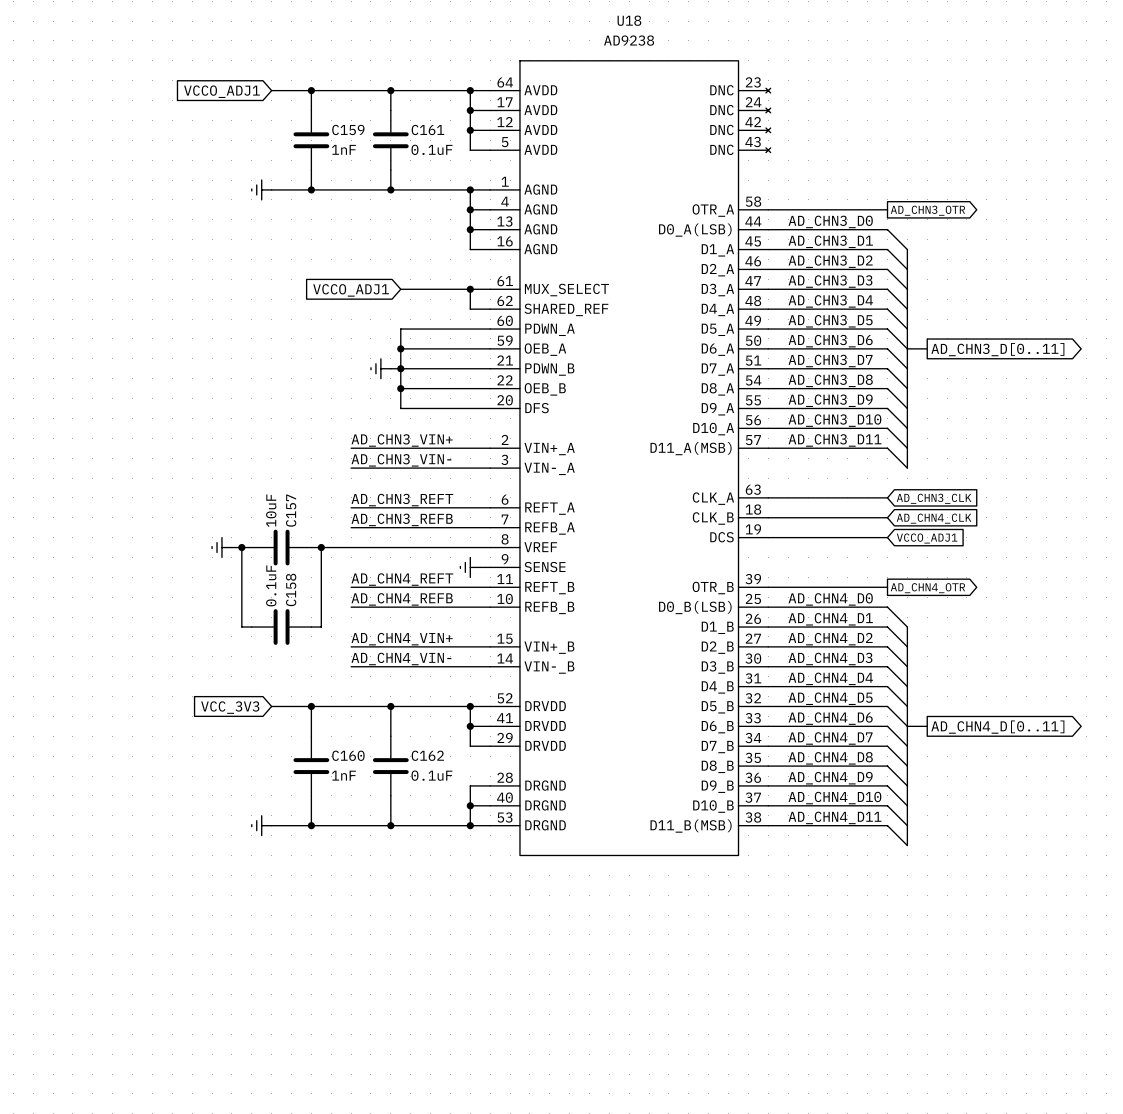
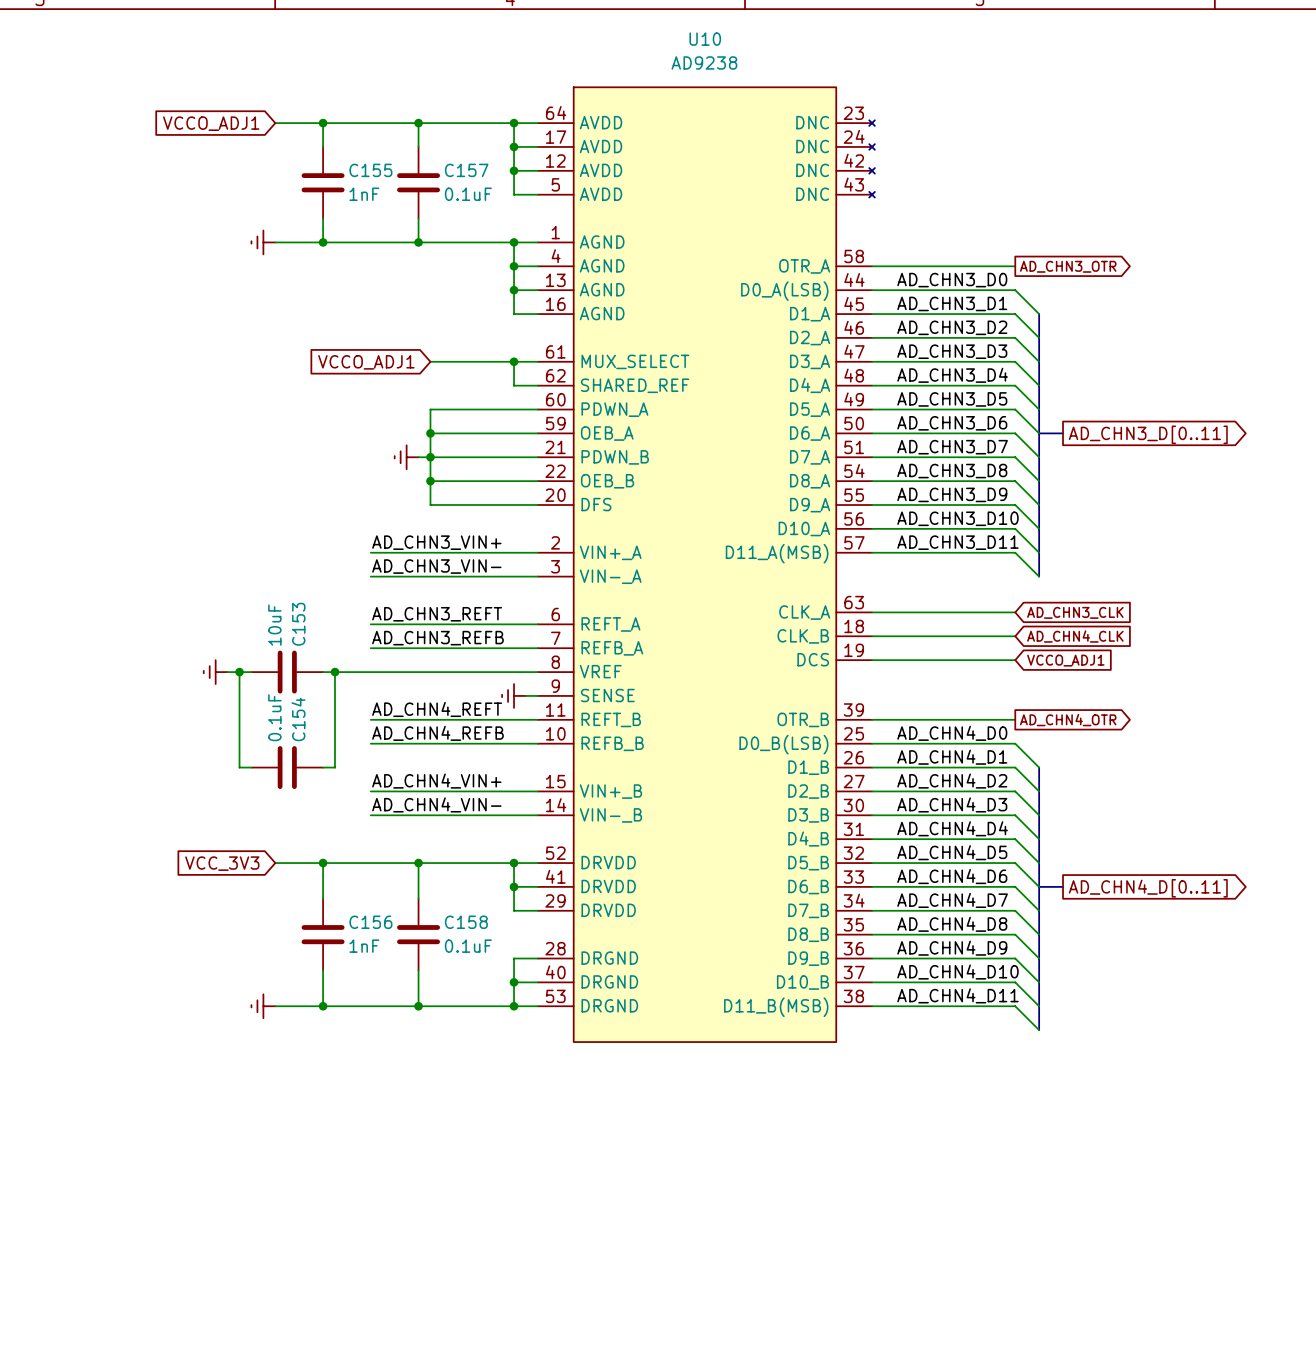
U18 name: U18 (629, 20) -> U10 (705, 39)
C159 name: C159 (348, 129) -> C155 (370, 170)
C161 name: C161 (427, 129) -> C157 (466, 170)
C157 name: C157 (291, 510) -> C153 (298, 624)
C158 name: C158 (291, 589) -> C154 (298, 719)
C160 name: C160 (348, 755) -> C156 (370, 922)
C162 name: C162 (427, 755) -> C158 (466, 922)

